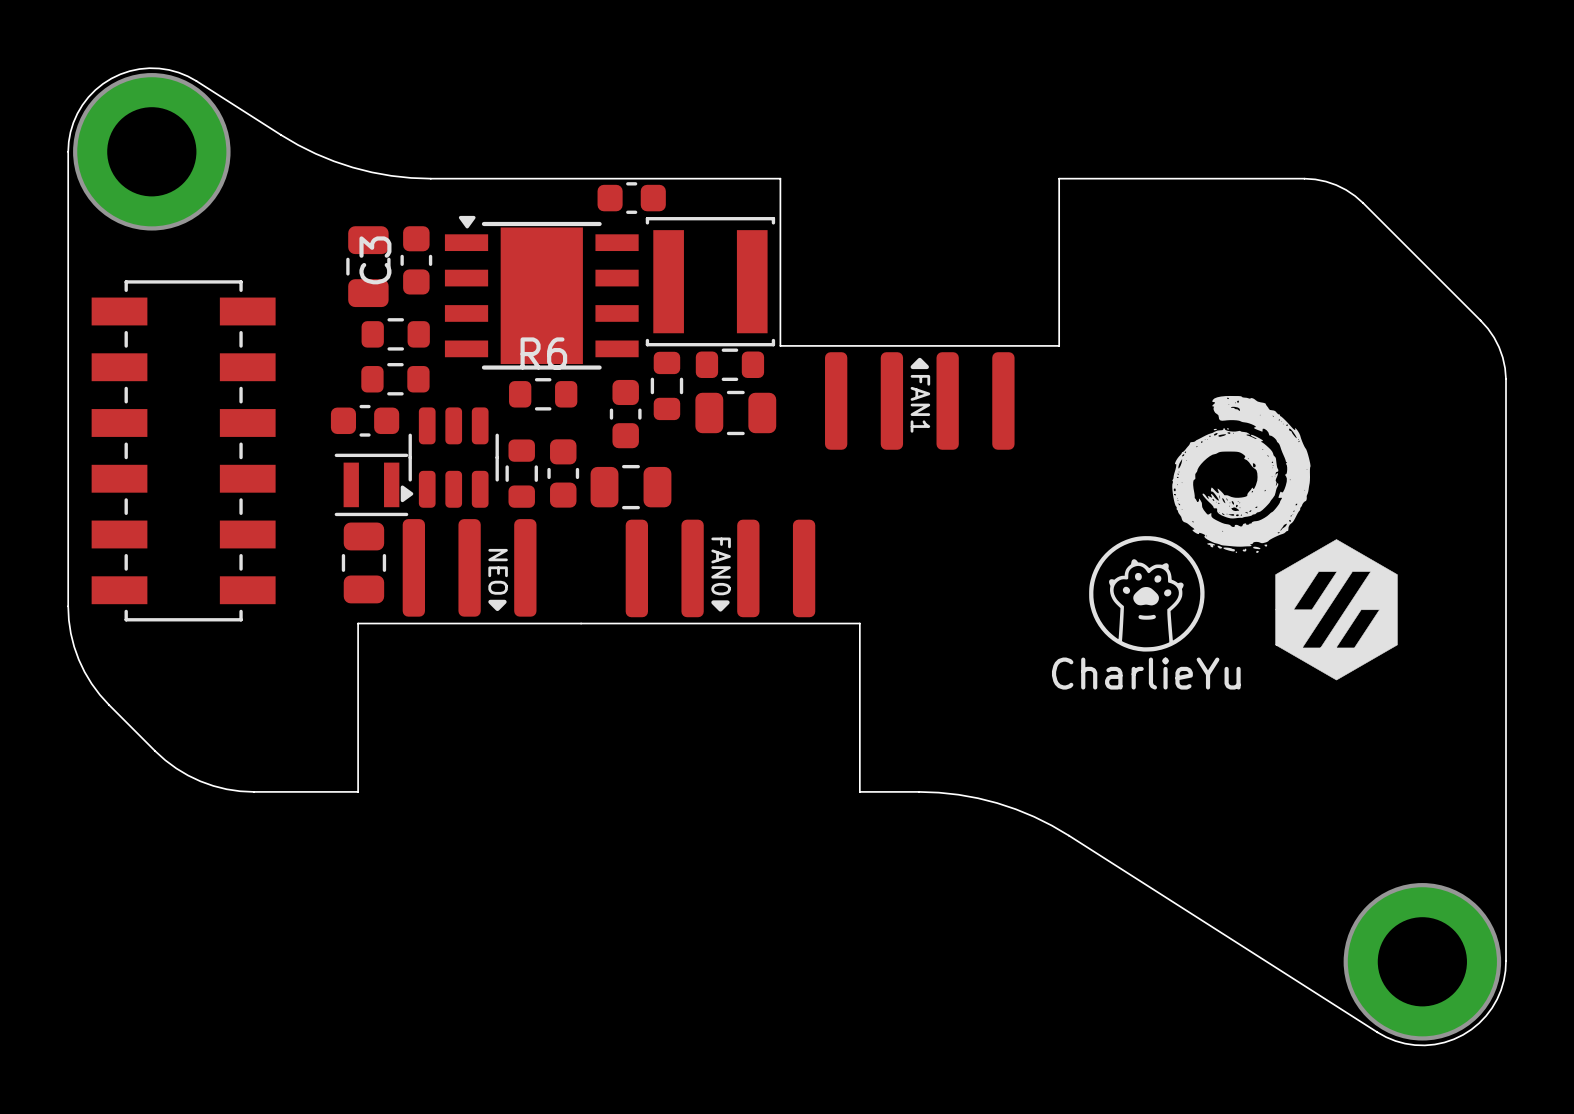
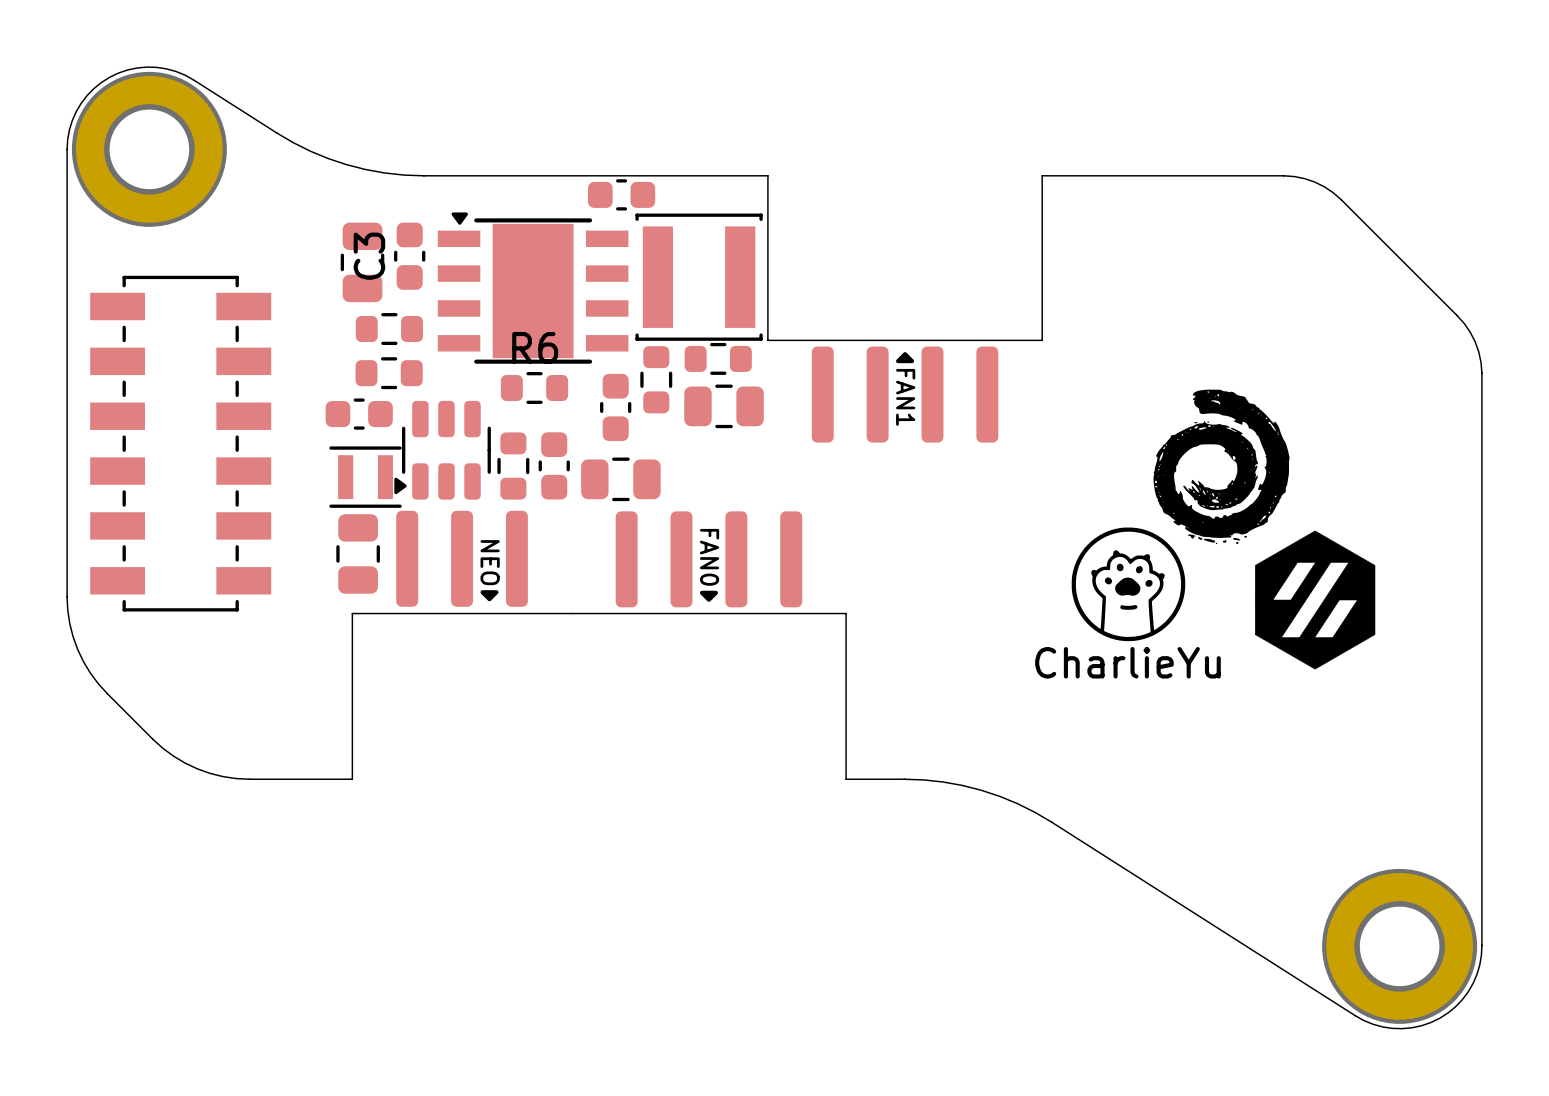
drawing: none -> [104, 104, 195, 195]
drawing: none -> [1354, 901, 1445, 992]

